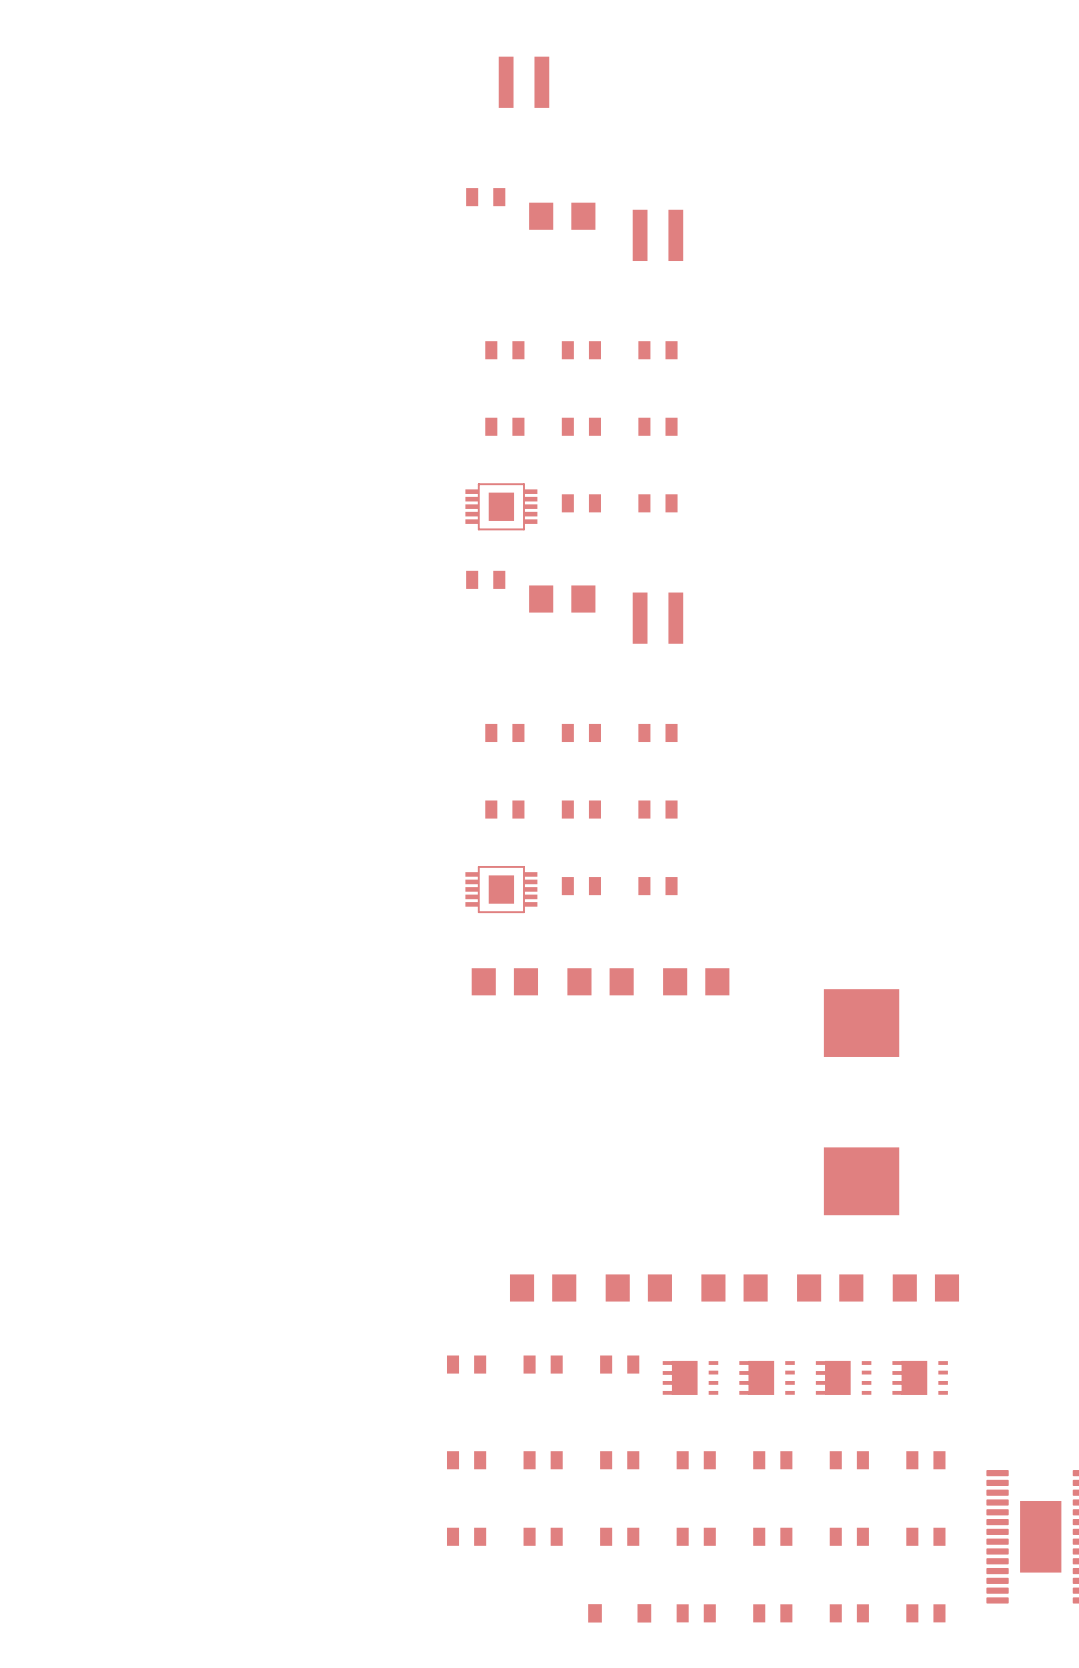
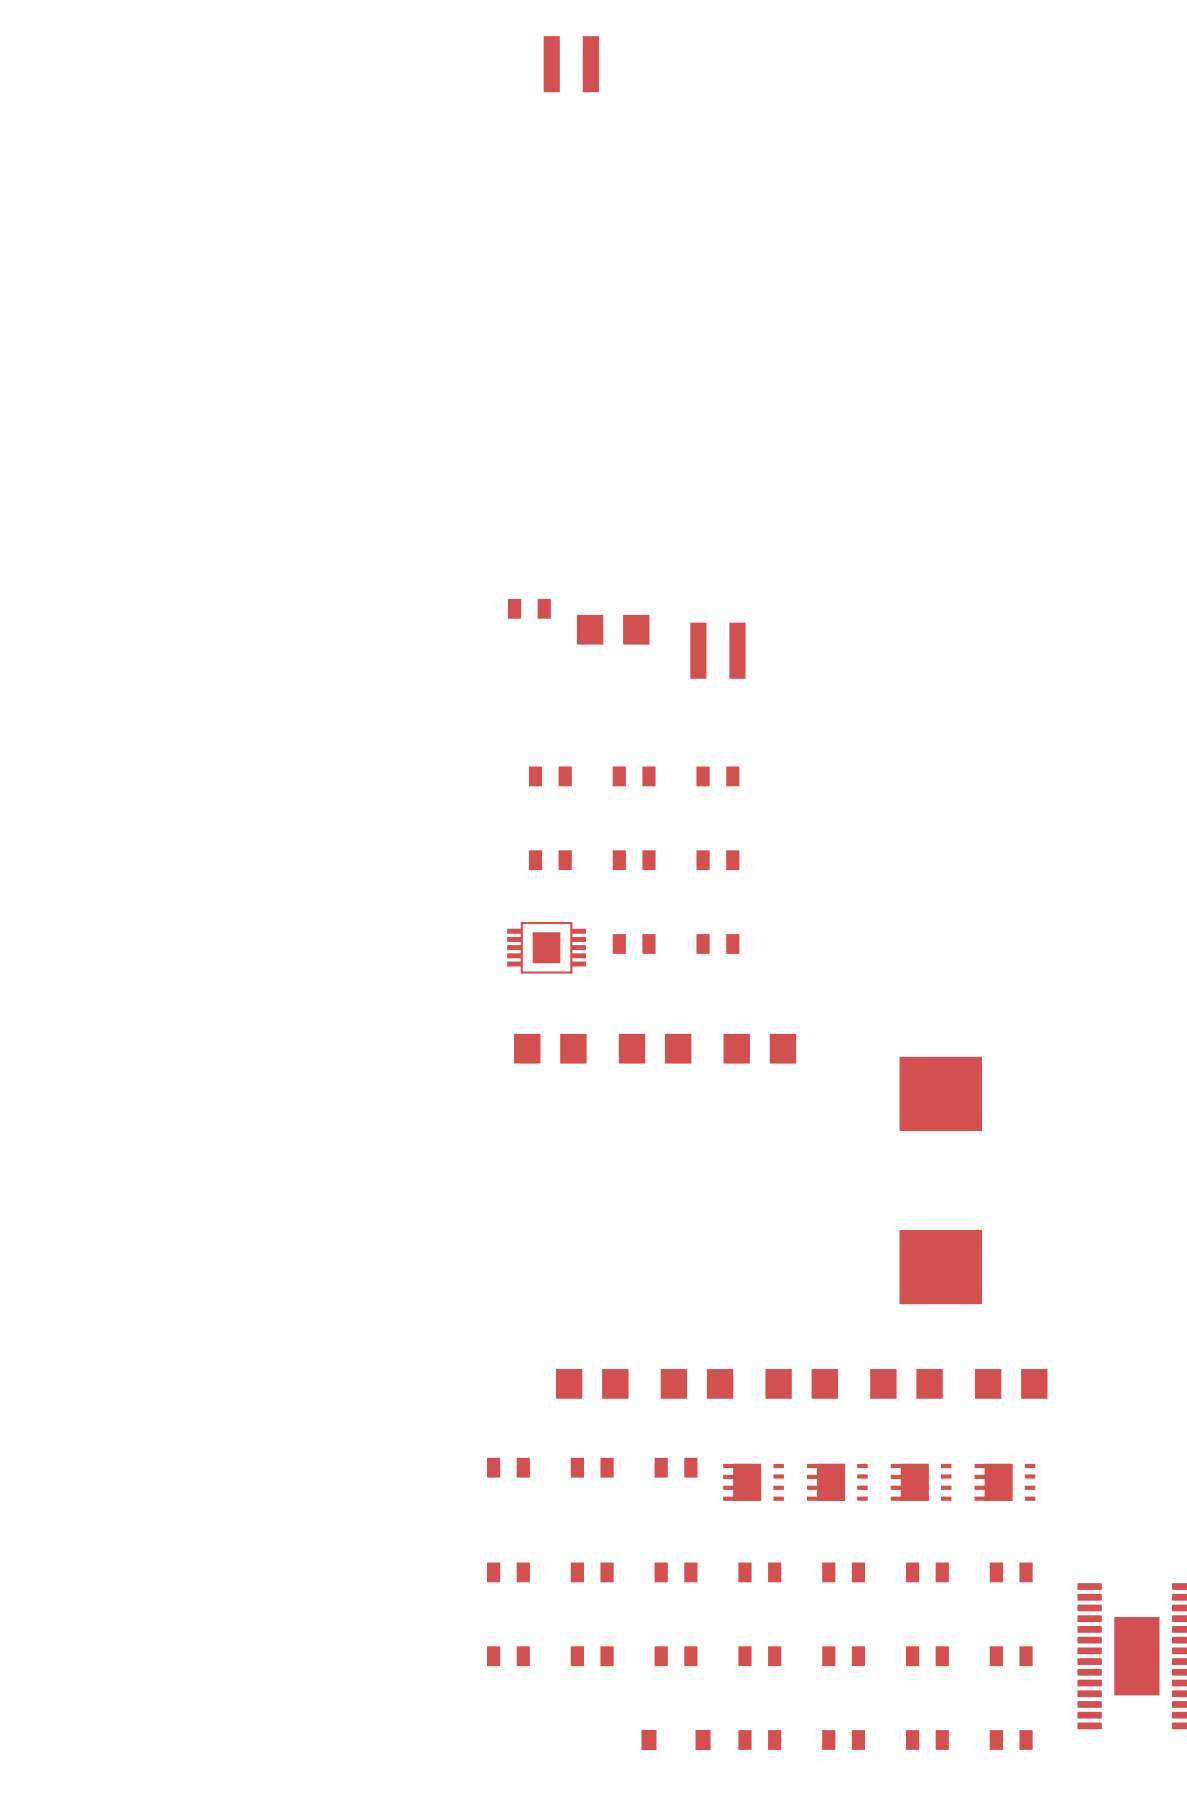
part: (485, 197) -> none
part: (562, 216) -> none
part: (657, 235) -> none
part: (504, 350) -> none
part: (581, 350) -> none
part: (657, 350) -> none
part: (504, 426) -> none
part: (581, 426) -> none
part: (657, 426) -> none
part: (581, 503) -> none
part: (657, 503) -> none
part: (501, 506) -> none

